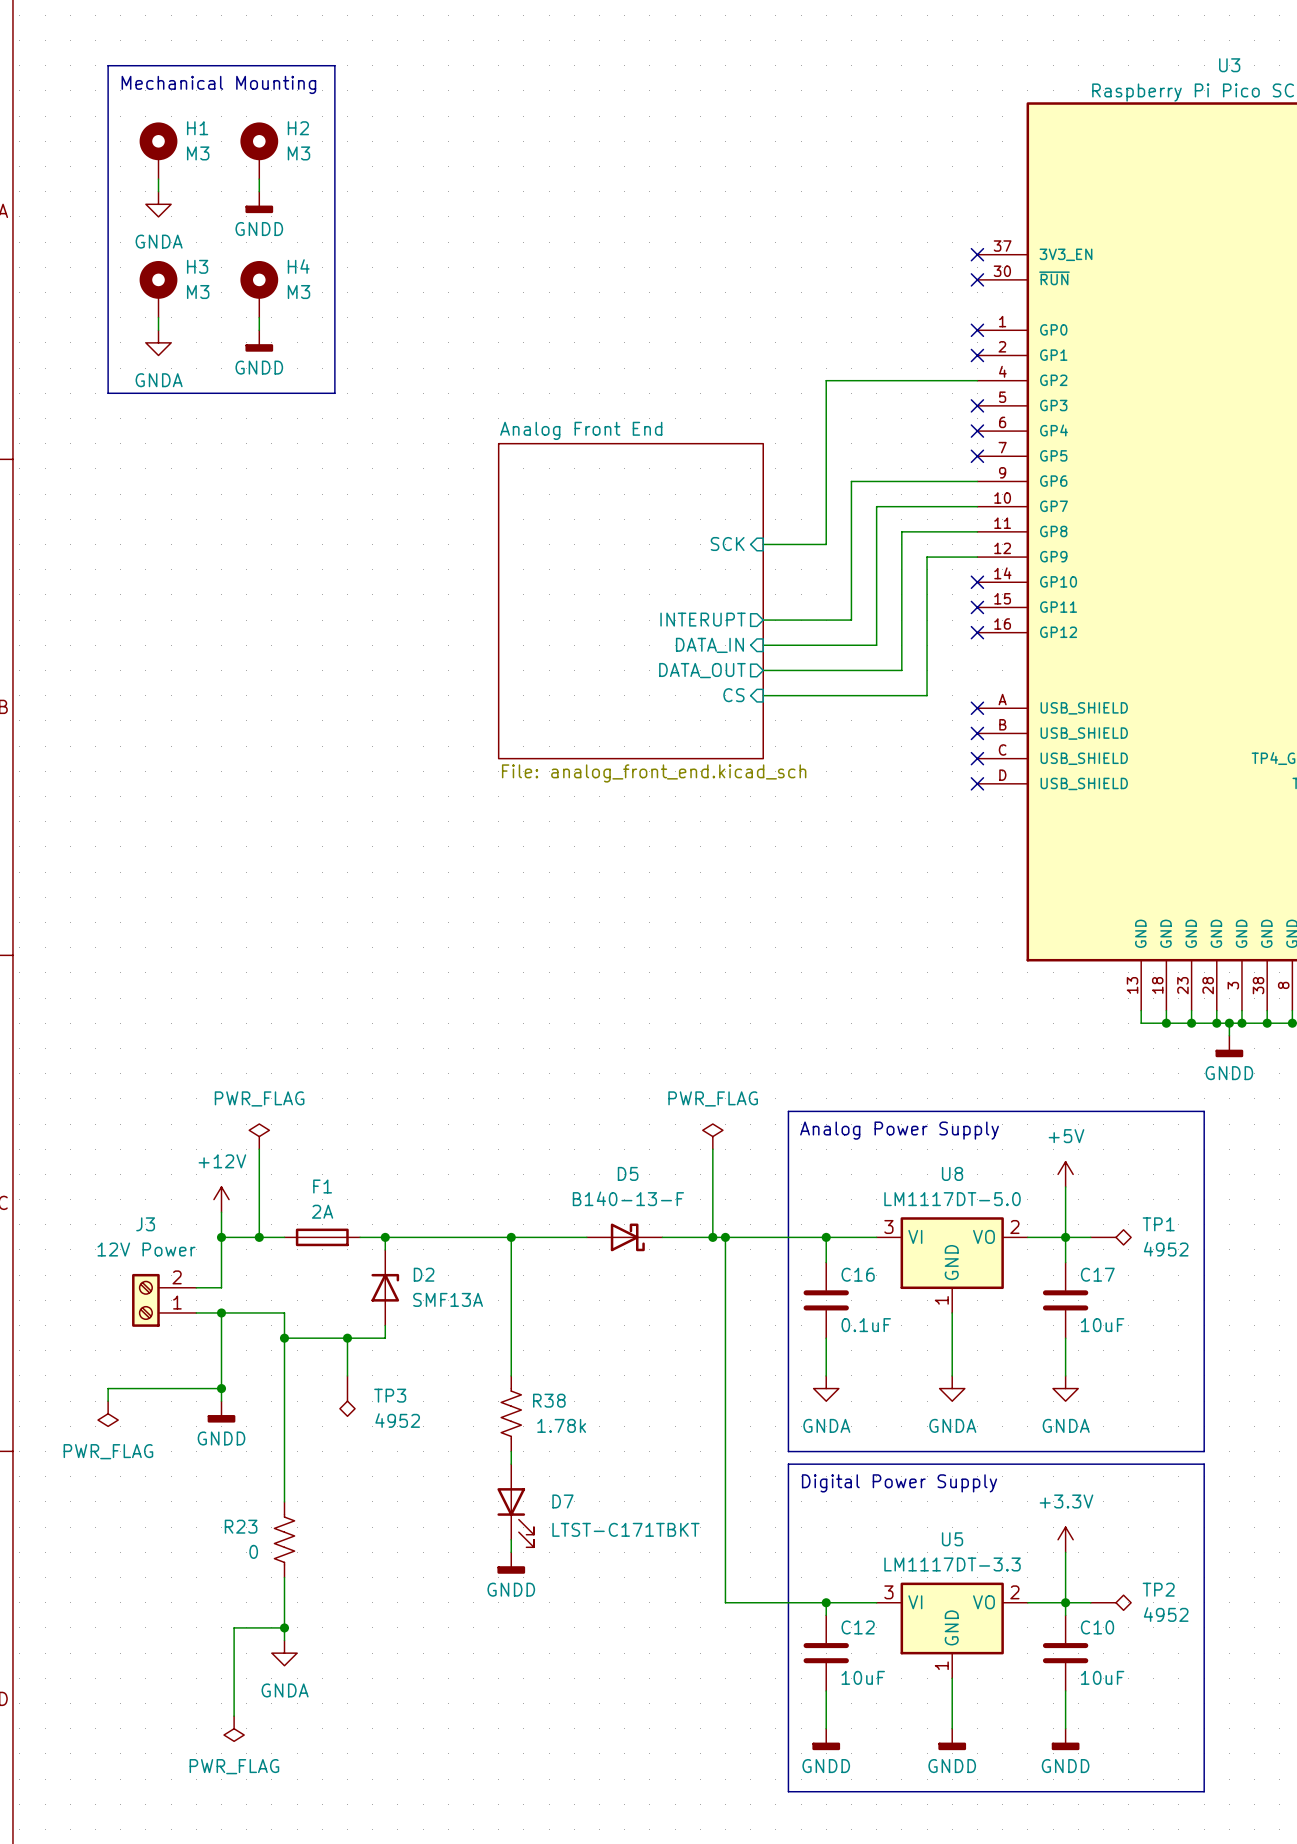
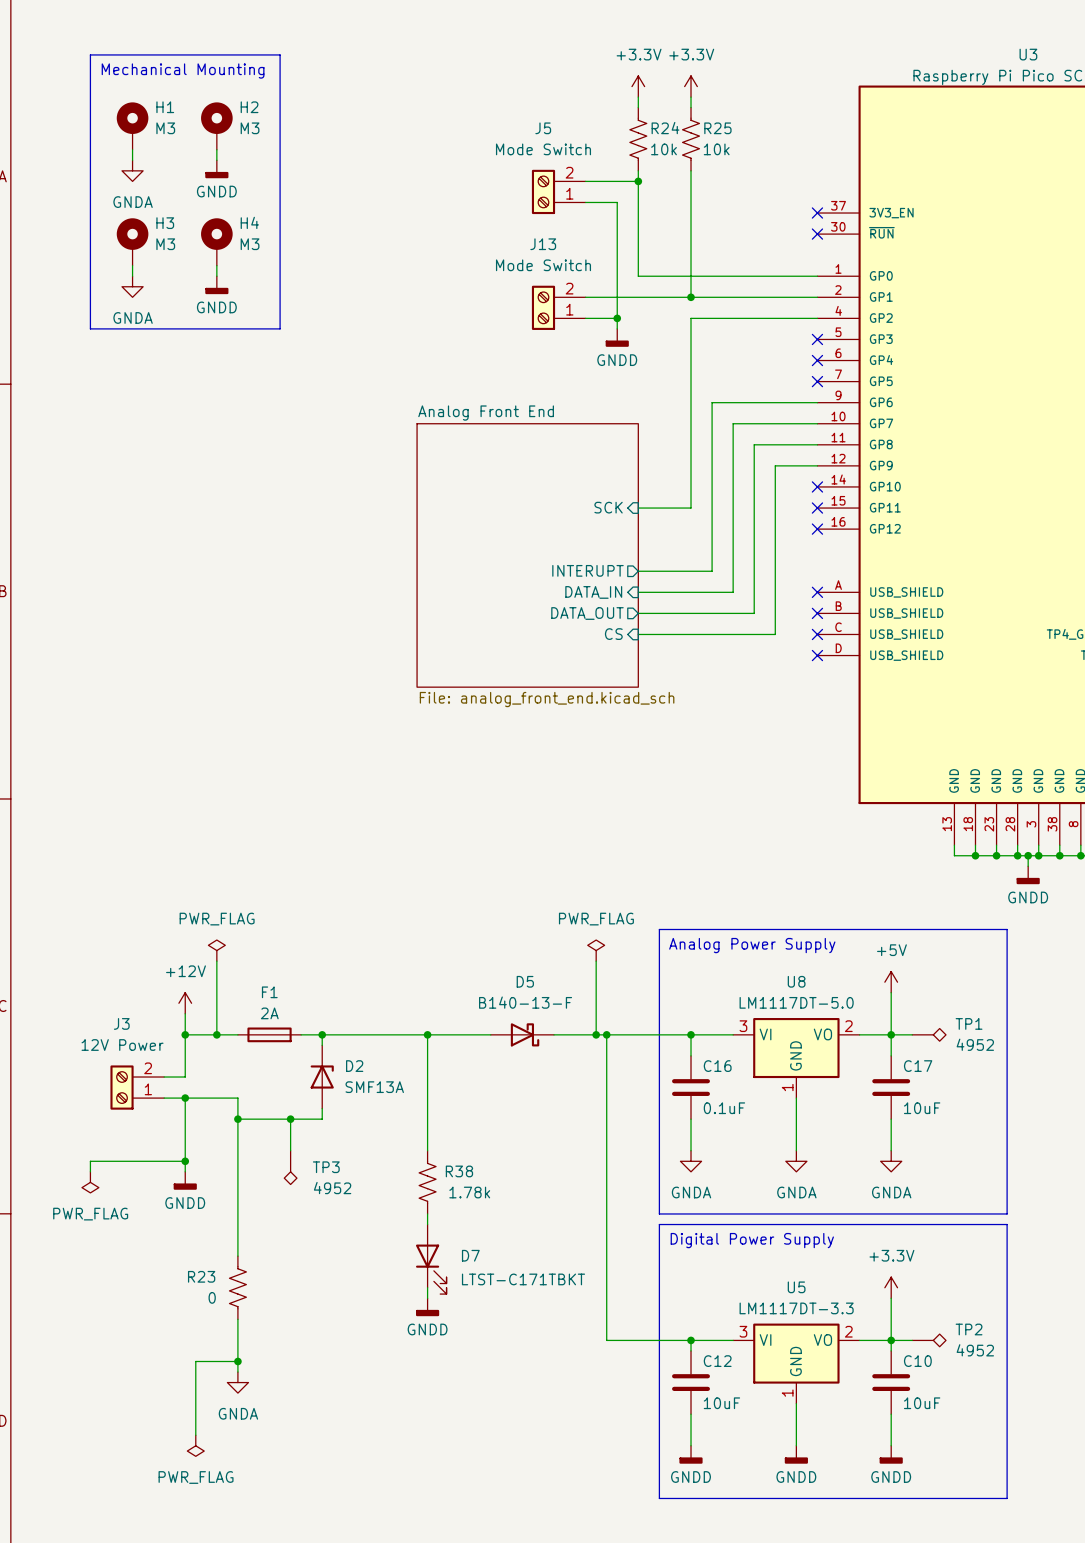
power symbol: none -> +3.3V (638, 86)
power symbol: none -> +3.3V (691, 86)
wire: none -> (638, 97) (638, 107)
wire: none -> (691, 97) (691, 107)
R24: none -> 10k (638, 139)
R25: none -> 10k (691, 139)
wire: none -> (638, 170) (638, 276) (817, 276)
wire: none -> (691, 170) (691, 297)
wire: none -> (585, 181) (638, 181)
junction: none -> (638, 181)
J5: none -> Mode Switch (558, 191)
wire: none -> (585, 202) (617, 202) (617, 328)
no-connect mark: (977, 330) -> none
wire: none -> (585, 297) (817, 297)
junction: none -> (691, 297)
no-connect mark: (977, 355) -> none
J13: none -> Mode Switch (558, 307)
wire: none -> (585, 318) (617, 318)
junction: none -> (617, 318)
power symbol: none -> GNDD (617, 337)
sheet pin position: SCK (727, 543) -> SCK (608, 507)
wire: (763, 544) (826, 544) -> (638, 508) (691, 508) (691, 455)
sheet Analog Front End position: (630, 601) -> (527, 555)
sheet pin position: INTERUPT (703, 619) -> INTERUPT (587, 570)
wire: (763, 620) (851, 620) -> (638, 571) (712, 571) (712, 518)
sheet pin position: DATA_IN (709, 645) -> DATA_IN (593, 592)
wire: (763, 645) (876, 645) -> (638, 592) (733, 592) (733, 539)
sheet pin position: DATA_OUT (702, 670) -> DATA_OUT (587, 613)
wire: (763, 670) (901, 670) -> (638, 613) (754, 613) (754, 560)
sheet pin position: CS (733, 695) -> CS (613, 634)
wire: (763, 695) (927, 695) -> (638, 634) (775, 634) (775, 581)

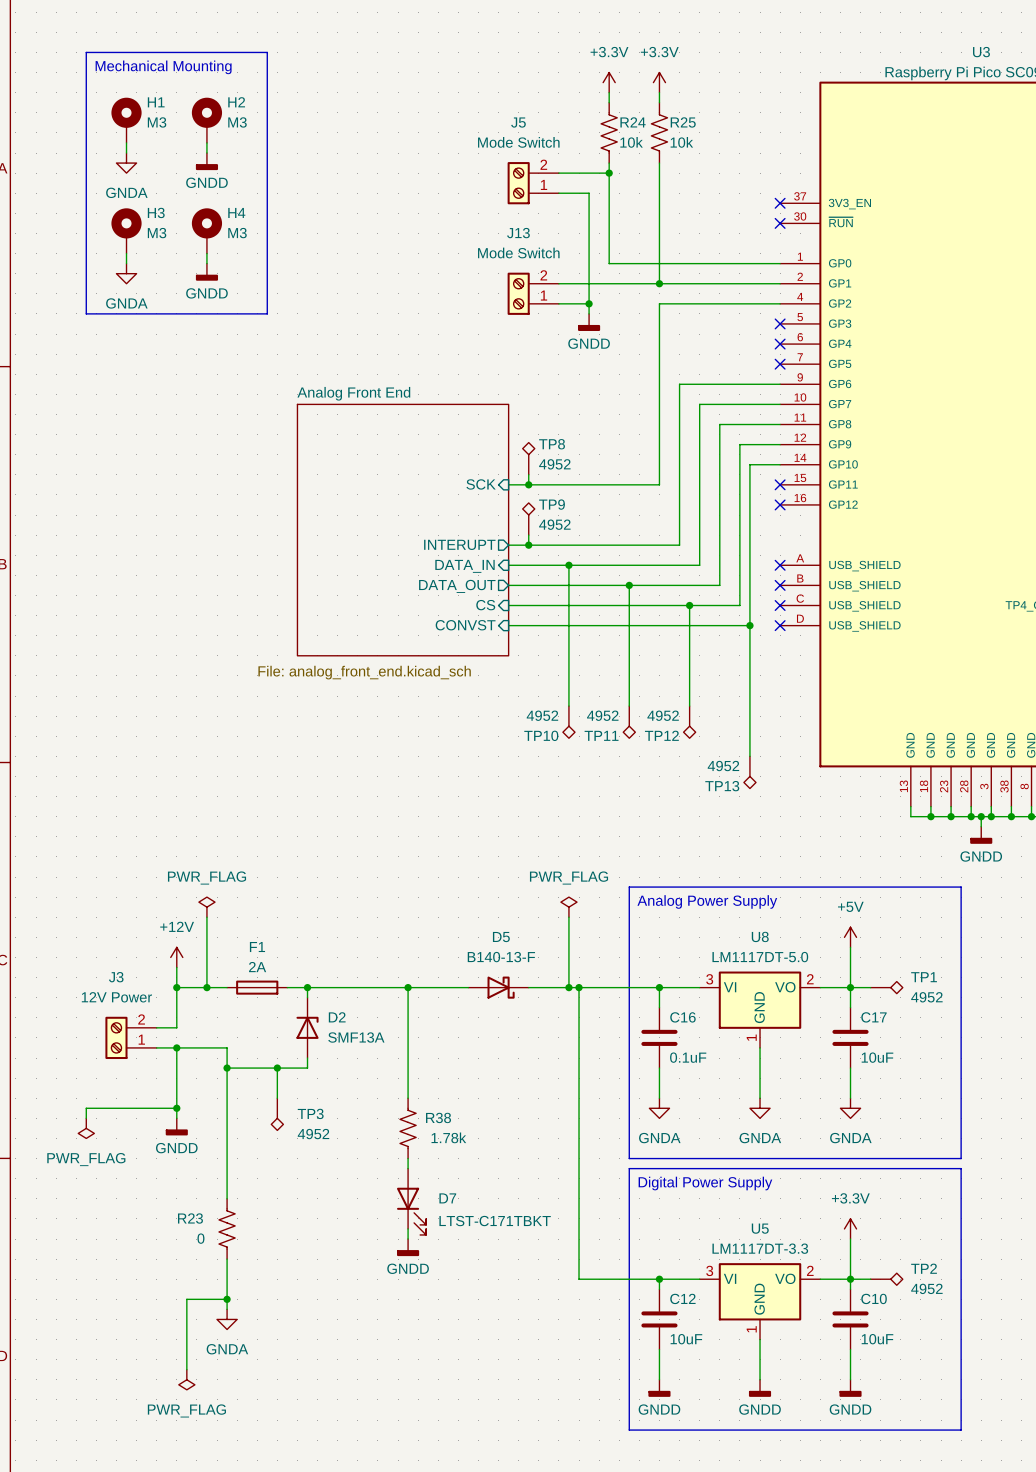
TP8: none -> 4952 (528, 458)
wire: none -> (780, 464) (749, 464) (749, 756)
no-connect mark: (817, 486) -> none
wire: none -> (528, 474) (528, 484)
sheet pin position: SCK (608, 507) -> SCK (481, 484)
wire: none -> (508, 484) (609, 484)
junction: none -> (528, 484)
TP9: none -> 4952 (528, 519)
sheet Analog Front End position: (527, 555) -> (403, 530)
wire: none -> (528, 535) (528, 545)
sheet pin position: INTERUPT (587, 570) -> INTERUPT (459, 544)
wire: none -> (508, 545) (609, 545)
junction: none -> (528, 545)
wire: none -> (508, 565) (609, 565)
sheet pin position: DATA_IN (593, 592) -> DATA_IN (464, 566)
wire: none -> (568, 565) (568, 706)
junction: none -> (568, 565)
wire: none -> (508, 585) (609, 585)
sheet pin position: DATA_OUT (587, 613) -> DATA_OUT (457, 586)
wire: none -> (629, 585) (629, 706)
junction: none -> (629, 585)
wire: none -> (508, 605) (609, 605)
sheet pin position: CS (613, 634) -> CS (485, 605)
wire: none -> (689, 605) (689, 706)
junction: none -> (689, 605)
sheet pin: none -> CONVST (465, 625)
wire: none -> (508, 625) (749, 625)
junction: none -> (749, 625)
sheet Analog Front End value position: File: analog_front_end.kicad_sch (547, 699) -> File: analog_front_end.kicad_sch (364, 672)
TP10: none -> 4952 (568, 722)
TP11: none -> 4952 (629, 722)
TP12: none -> 4952 (689, 722)
TP13: none -> 4952 (749, 772)

